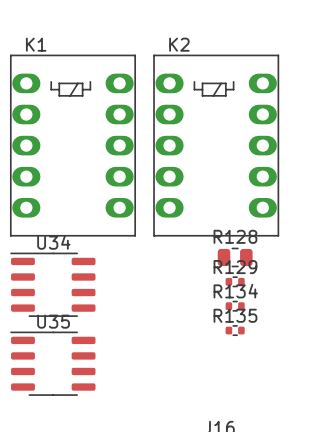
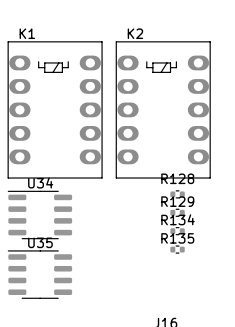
R128 footprint: [217, 247, 253, 268] -> [170, 190, 185, 199]

